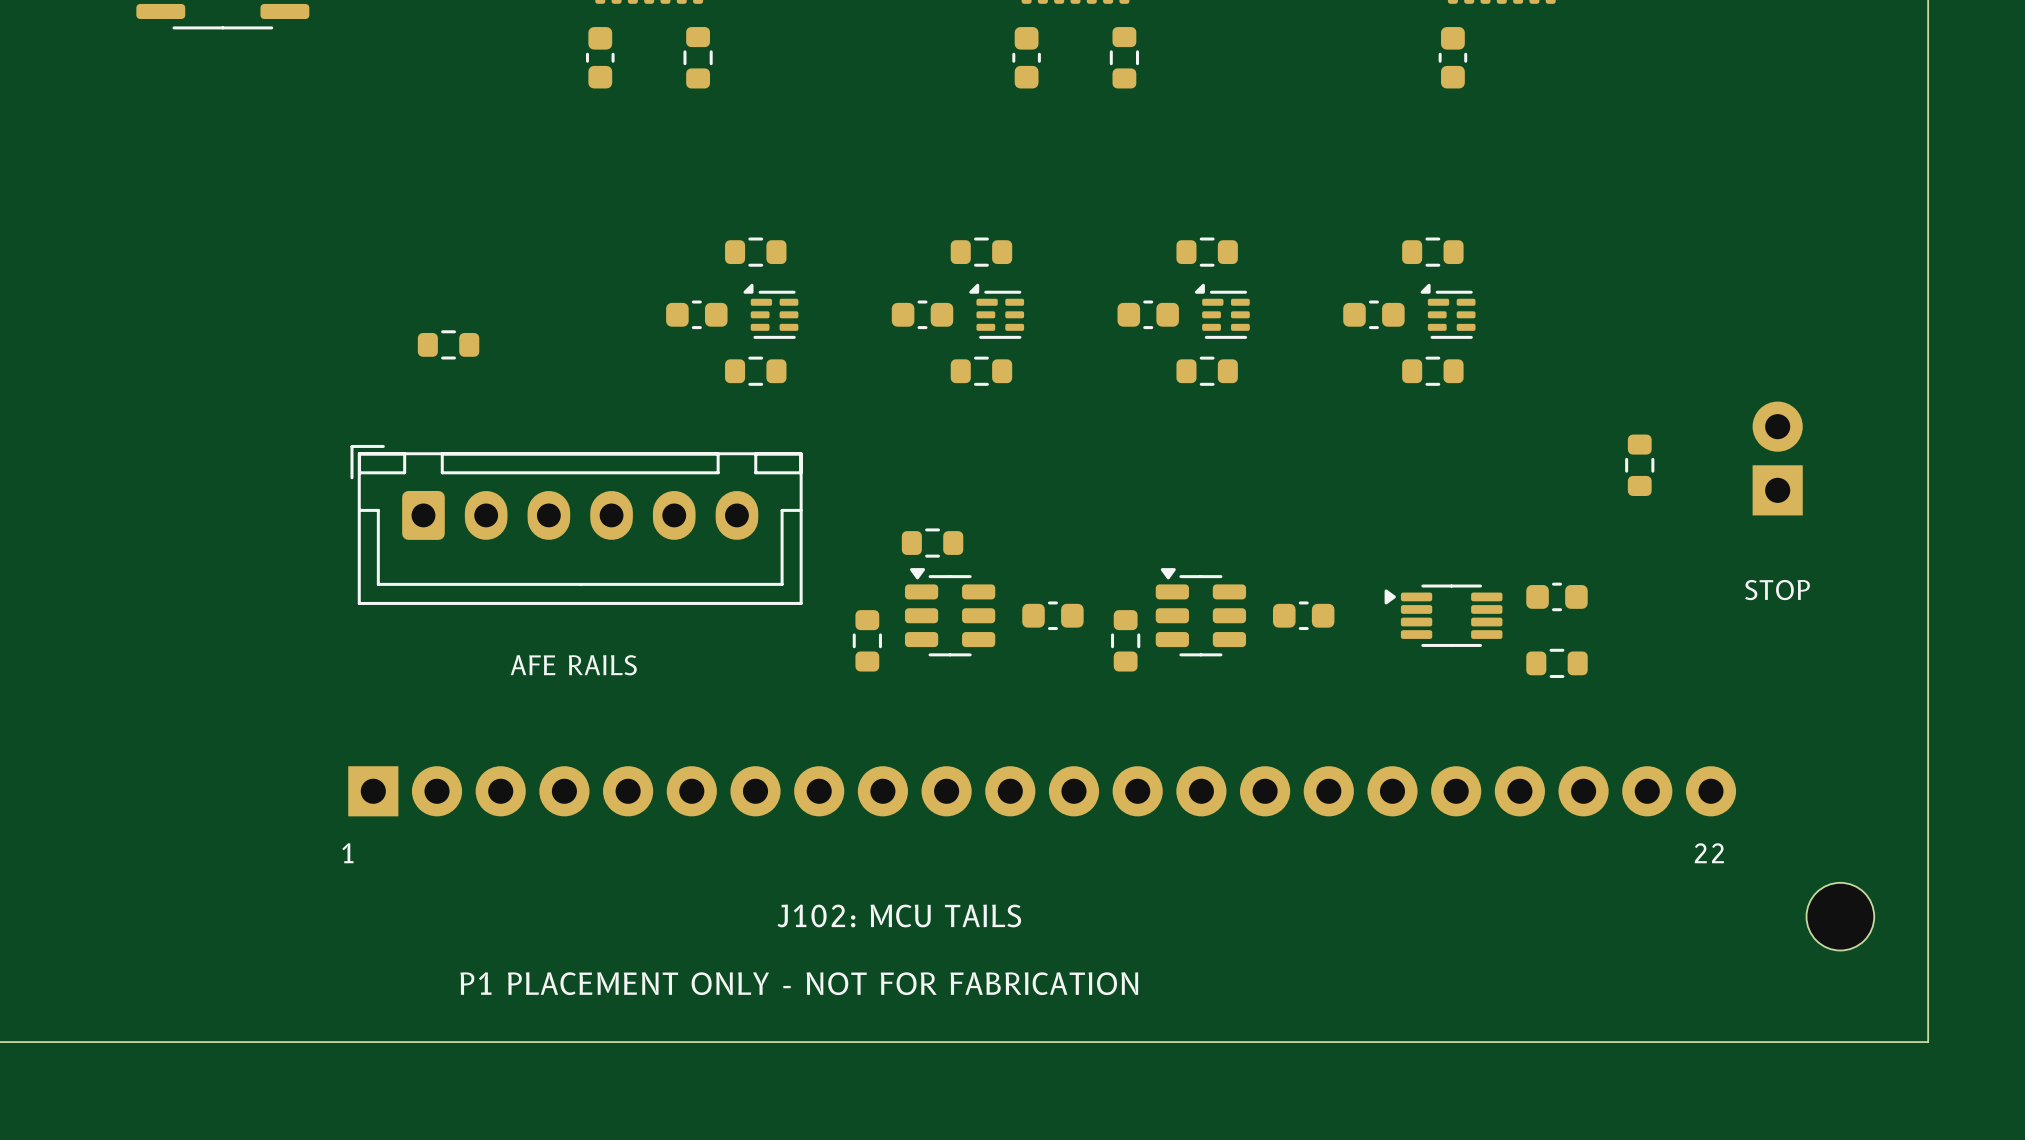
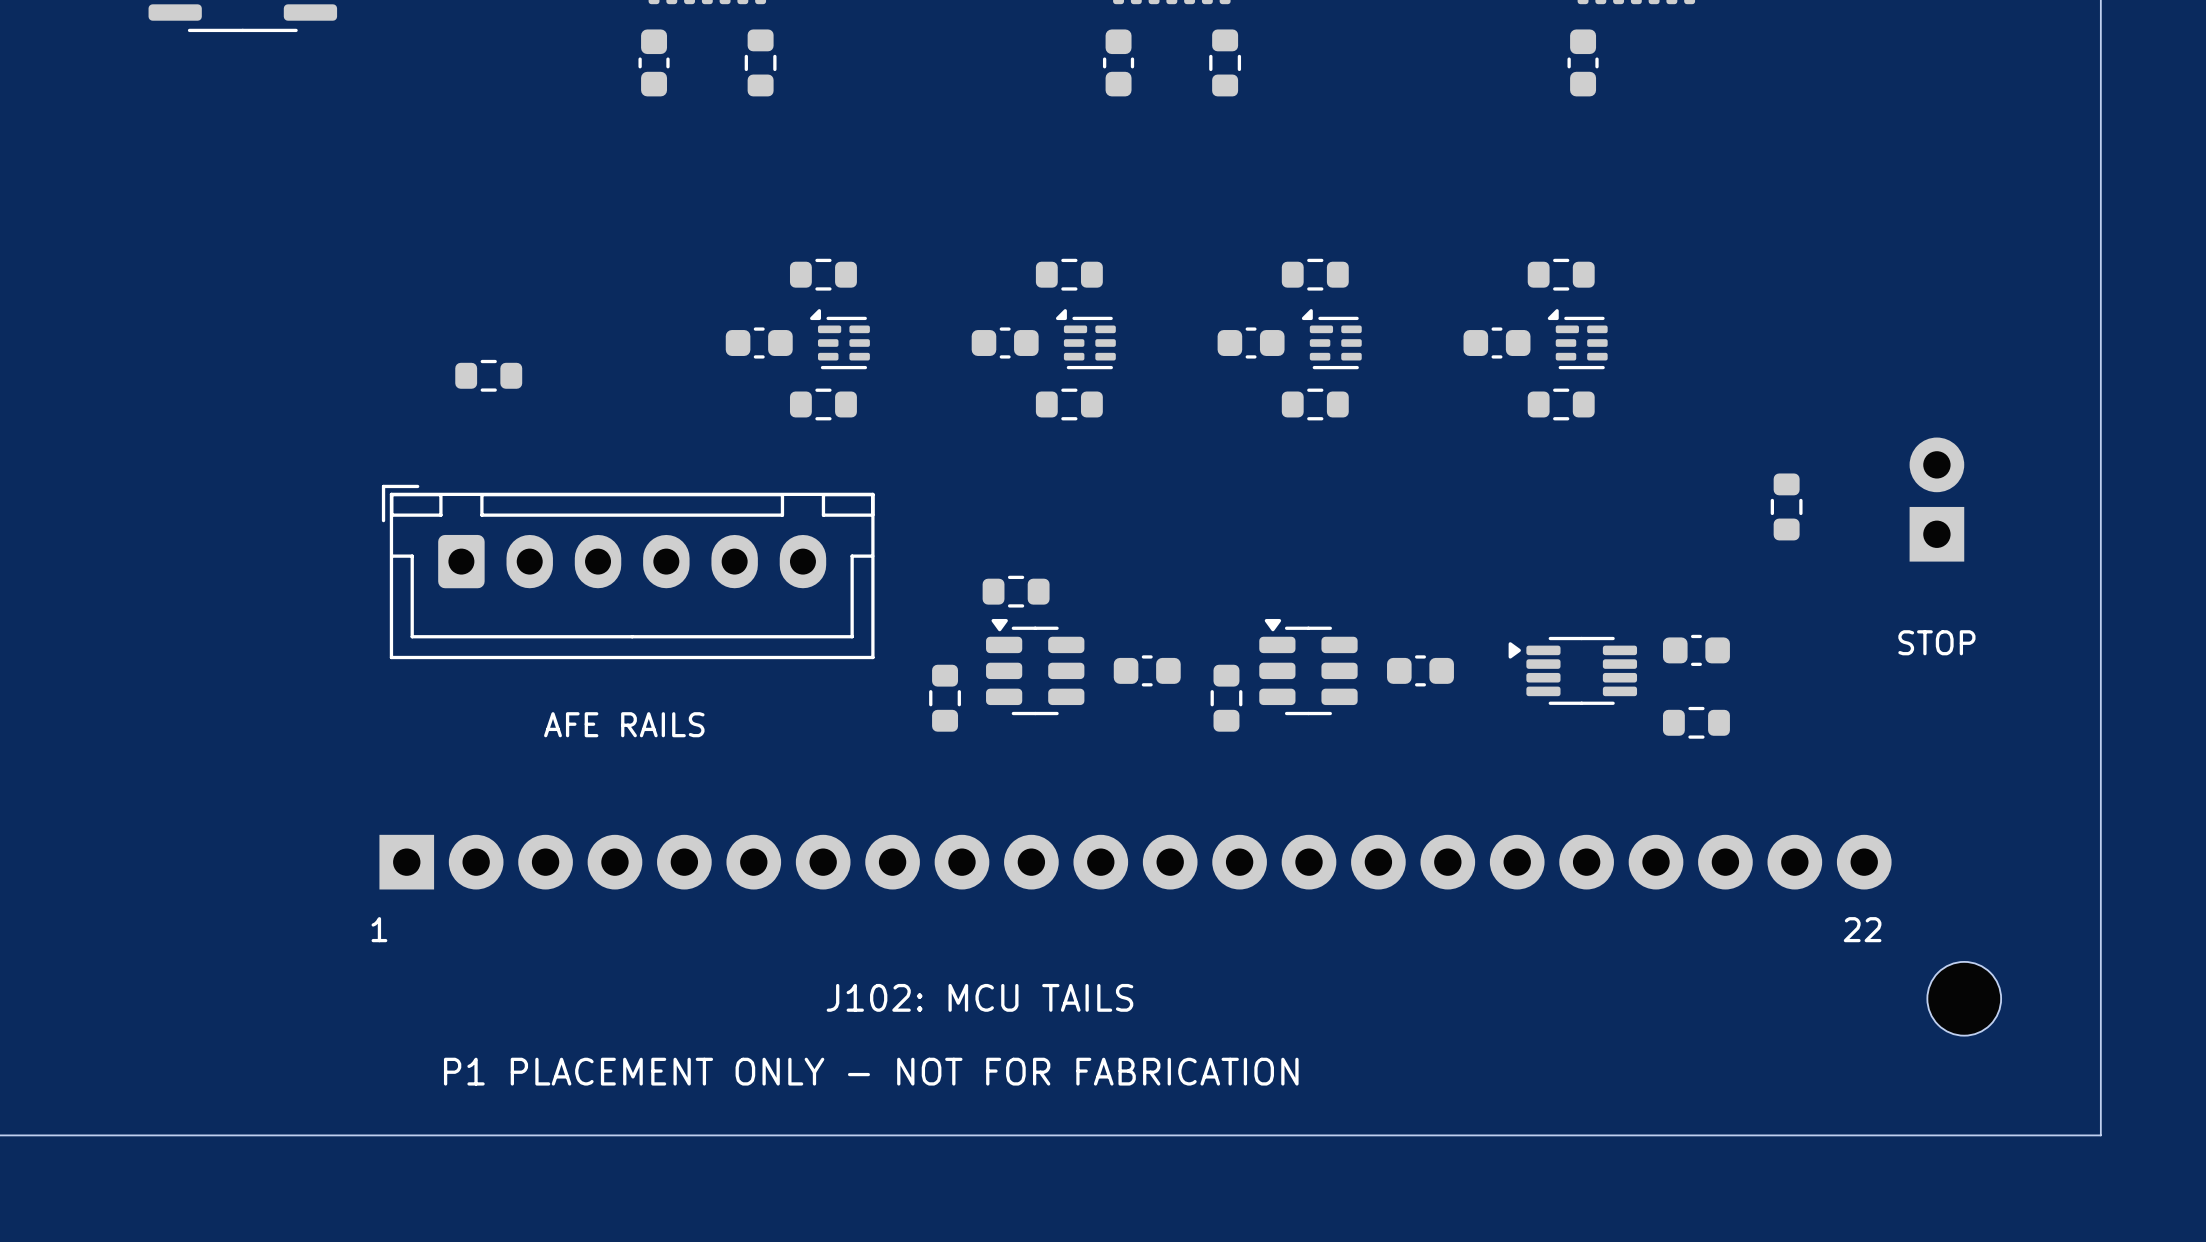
part position: (1840, 916) -> (1964, 998)

